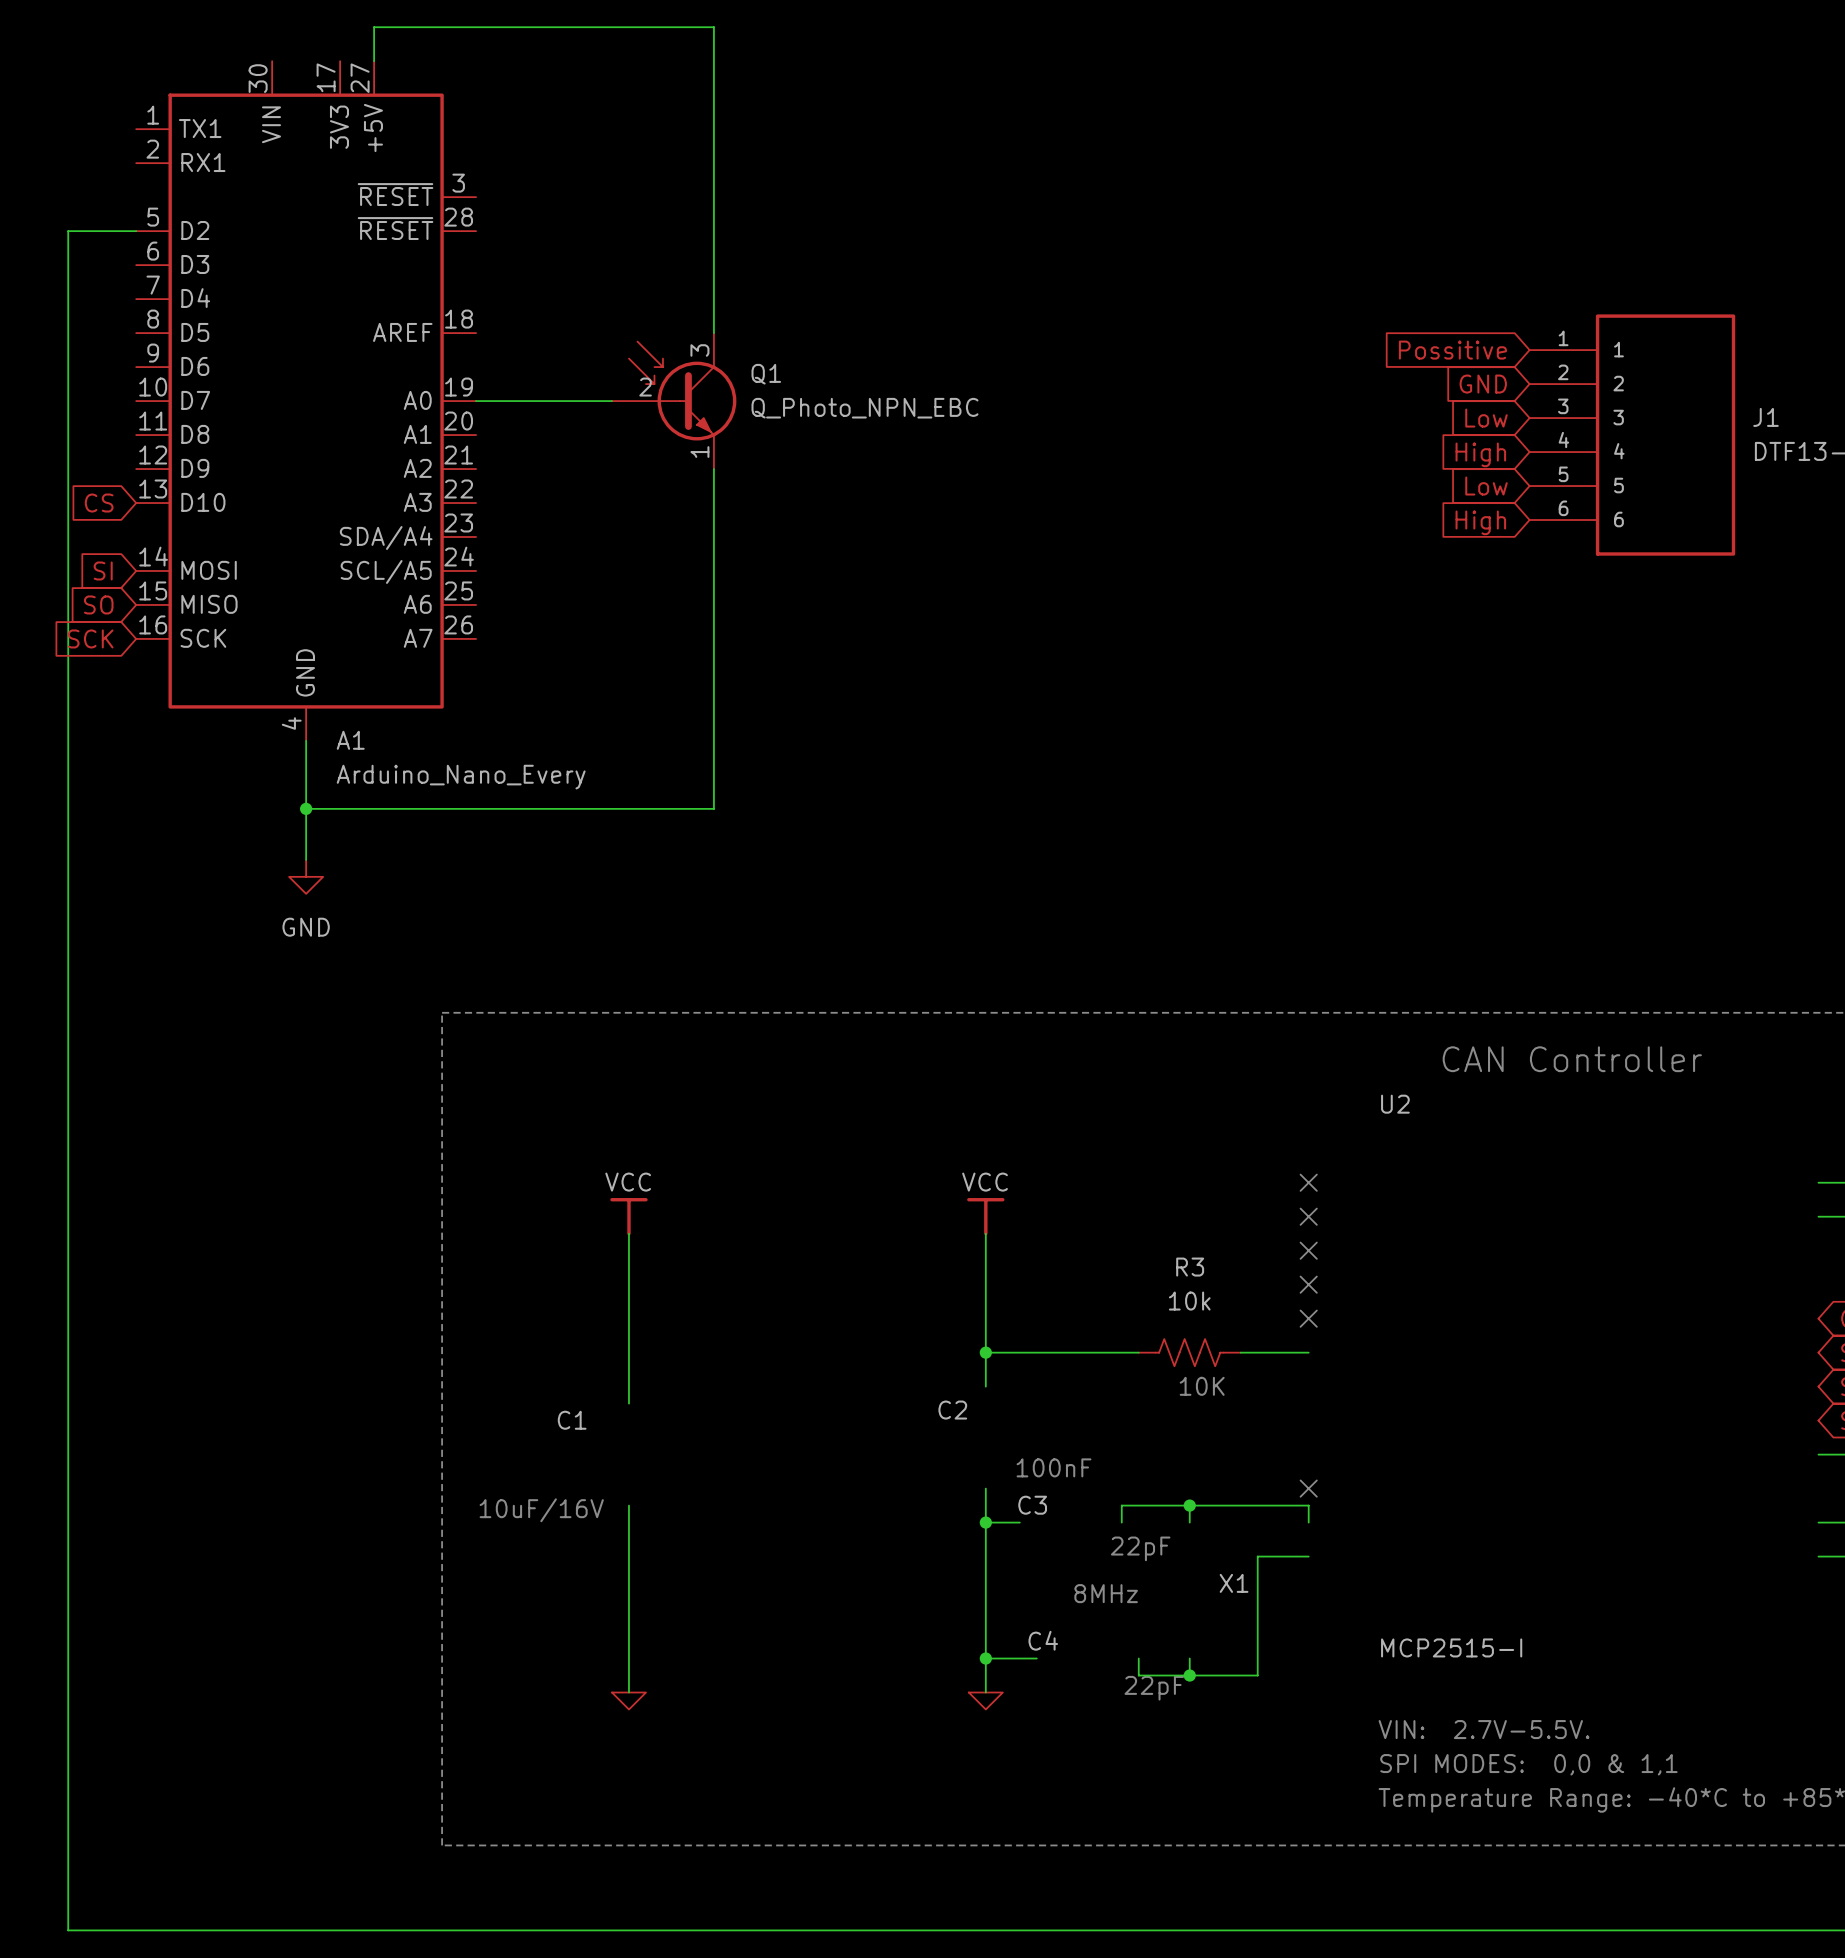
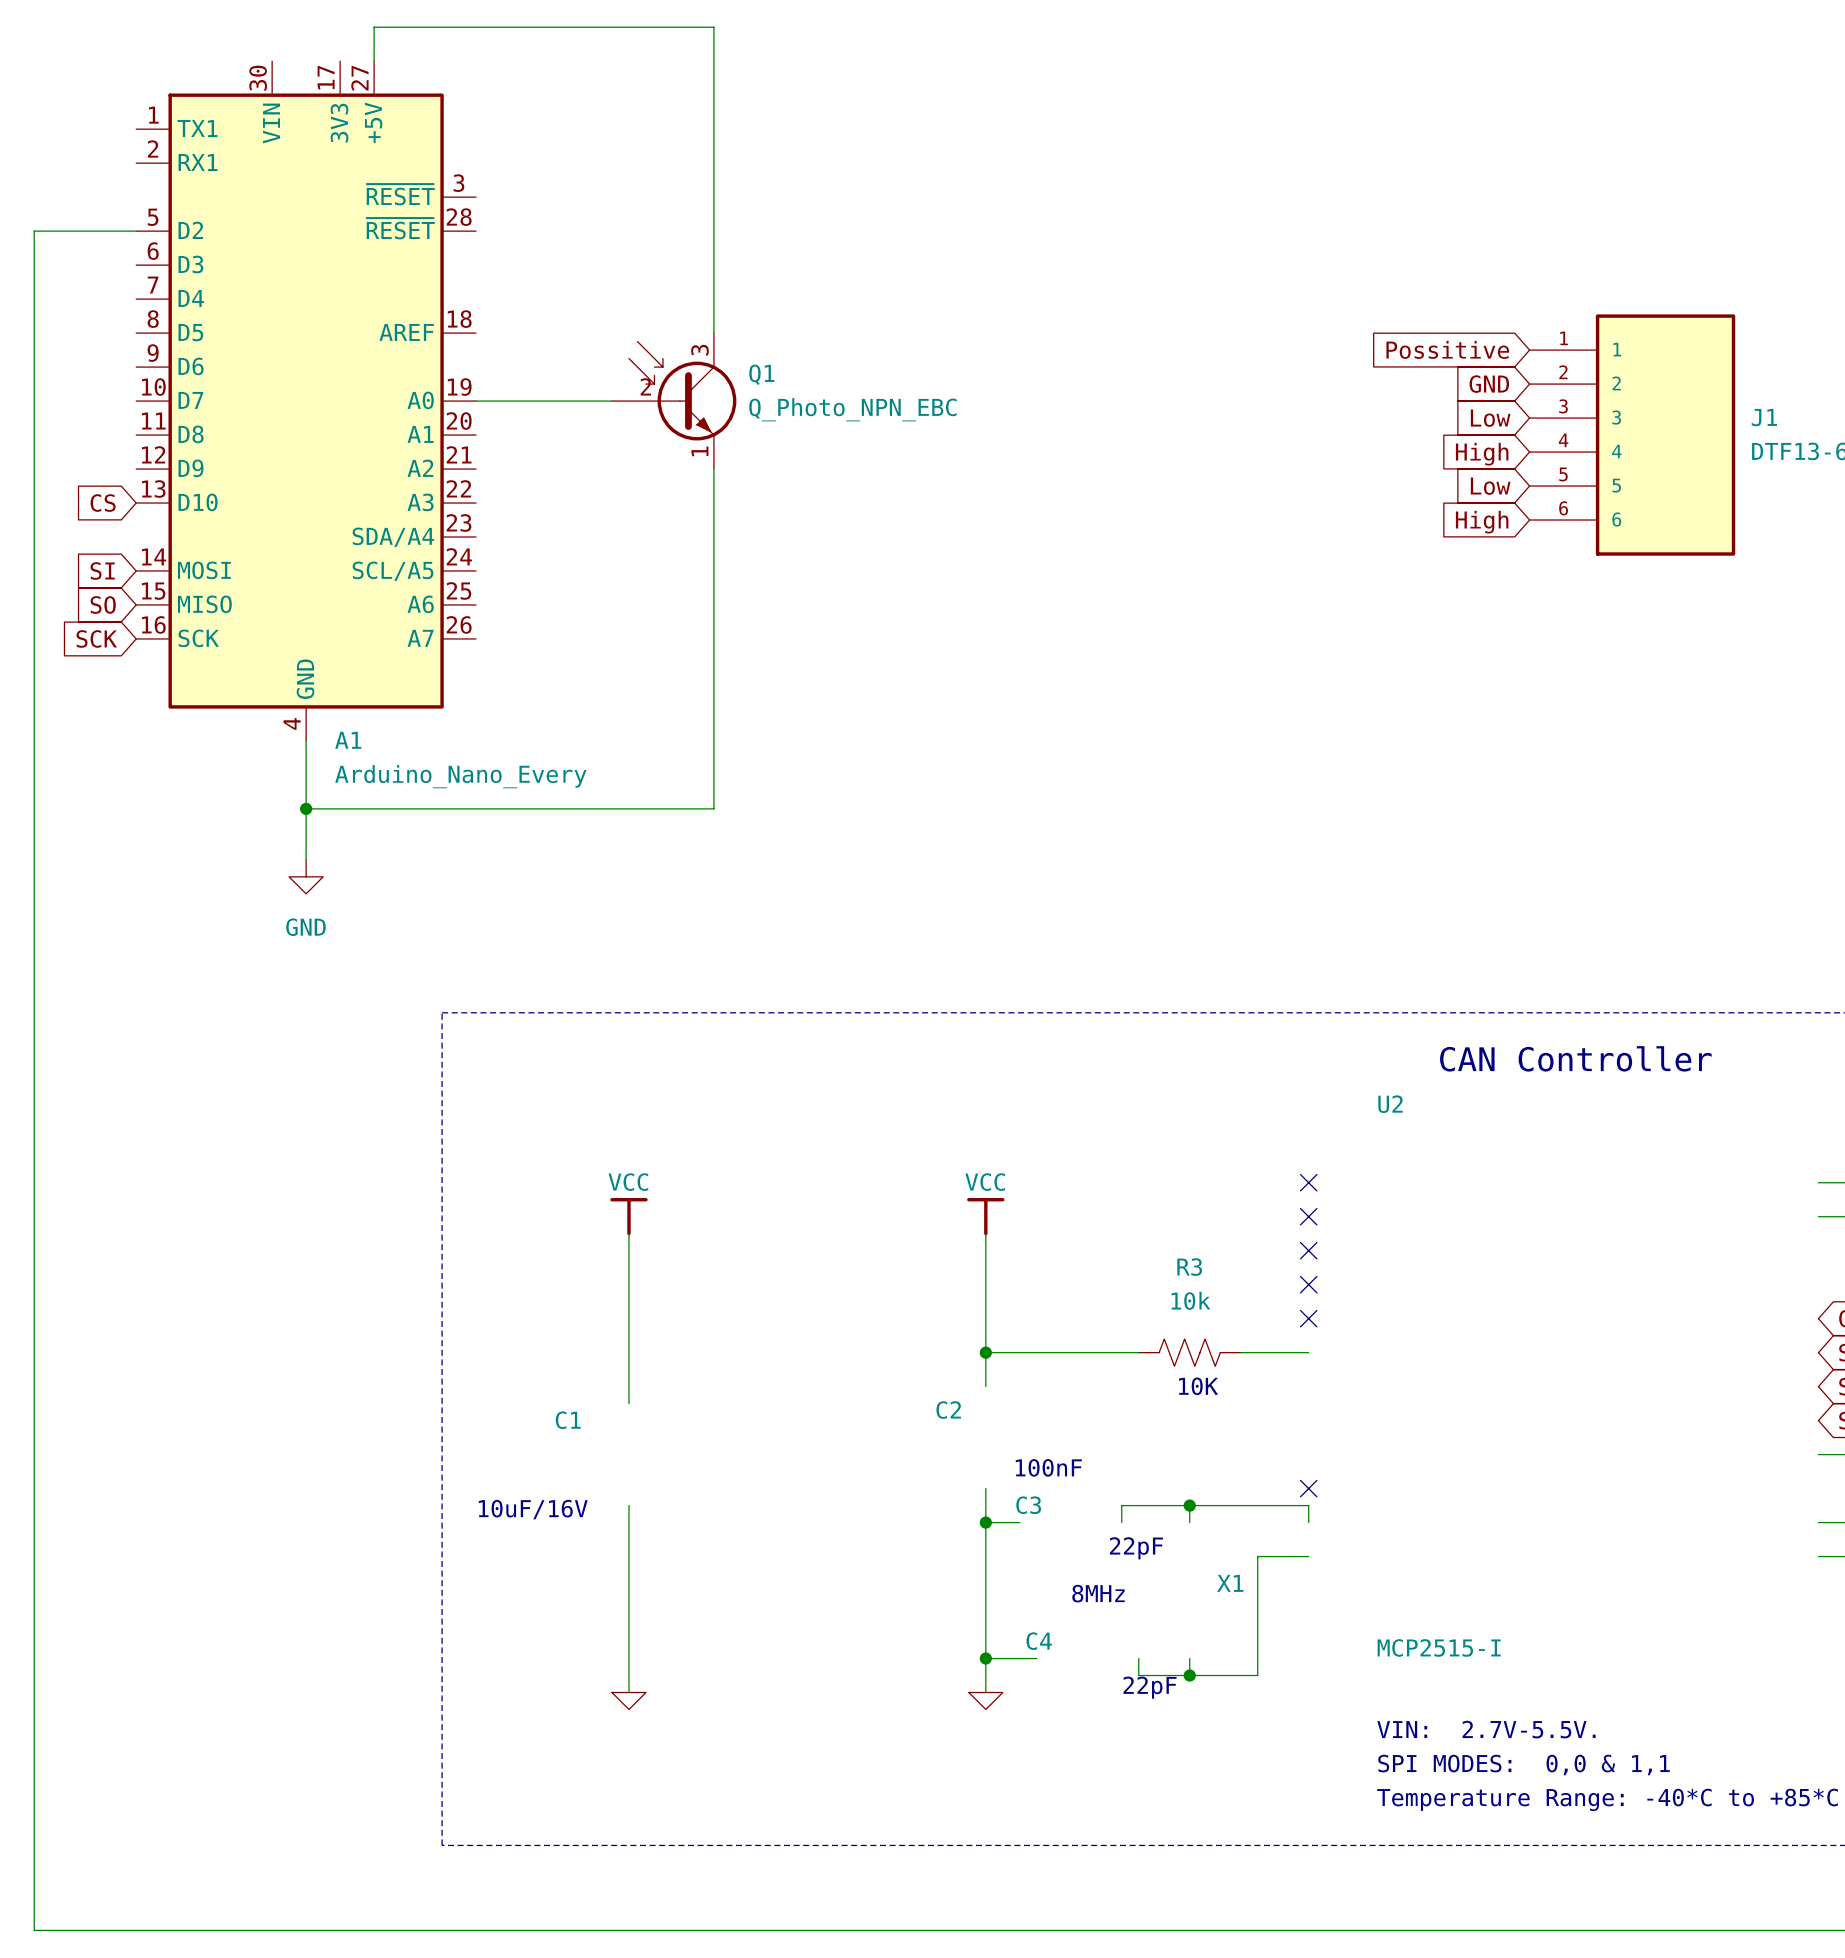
wire: (68, 231) (68, 1930) -> (68, 231) (34, 231) (34, 1930) (68, 1930)

